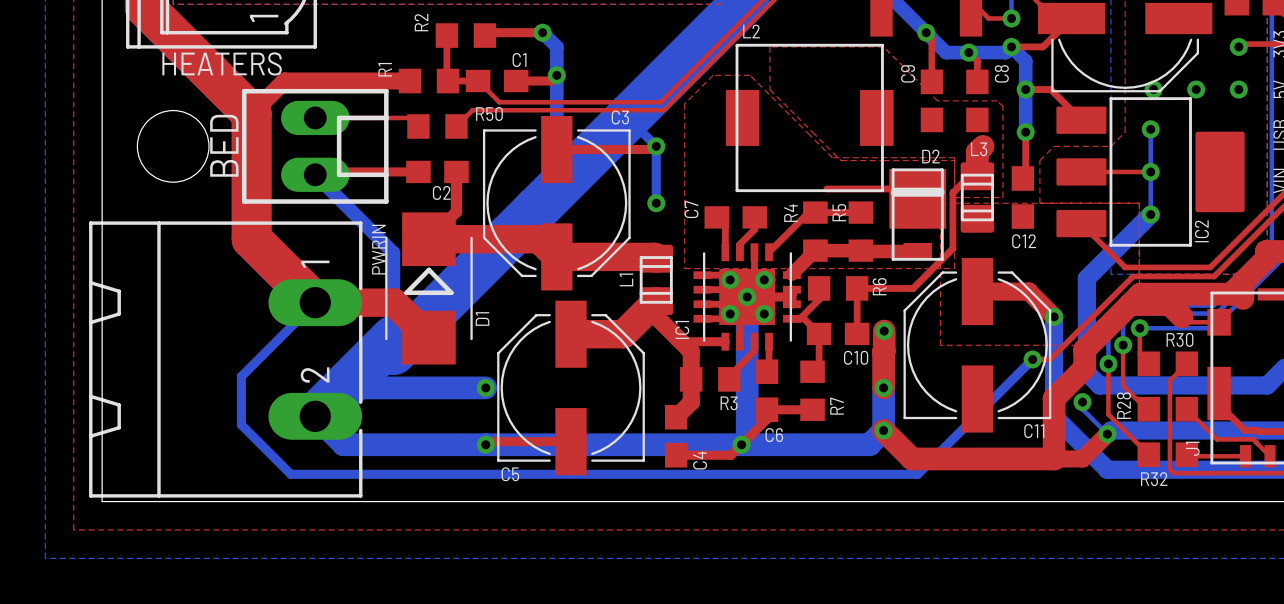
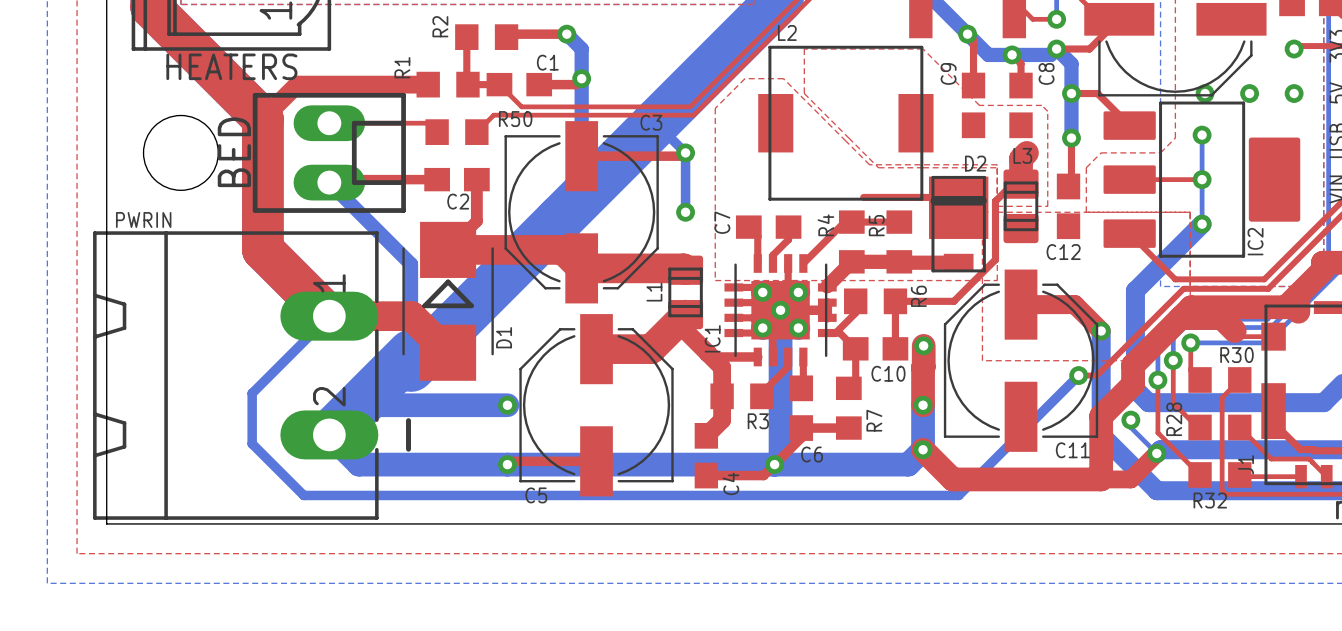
PWRIN name rotation: 0° (378, 249) -> 90° clockwise (143, 219)
PWRIN name position: PWRIN (378, 249) -> PWRIN (143, 219)
text: none -> - (408, 434)

